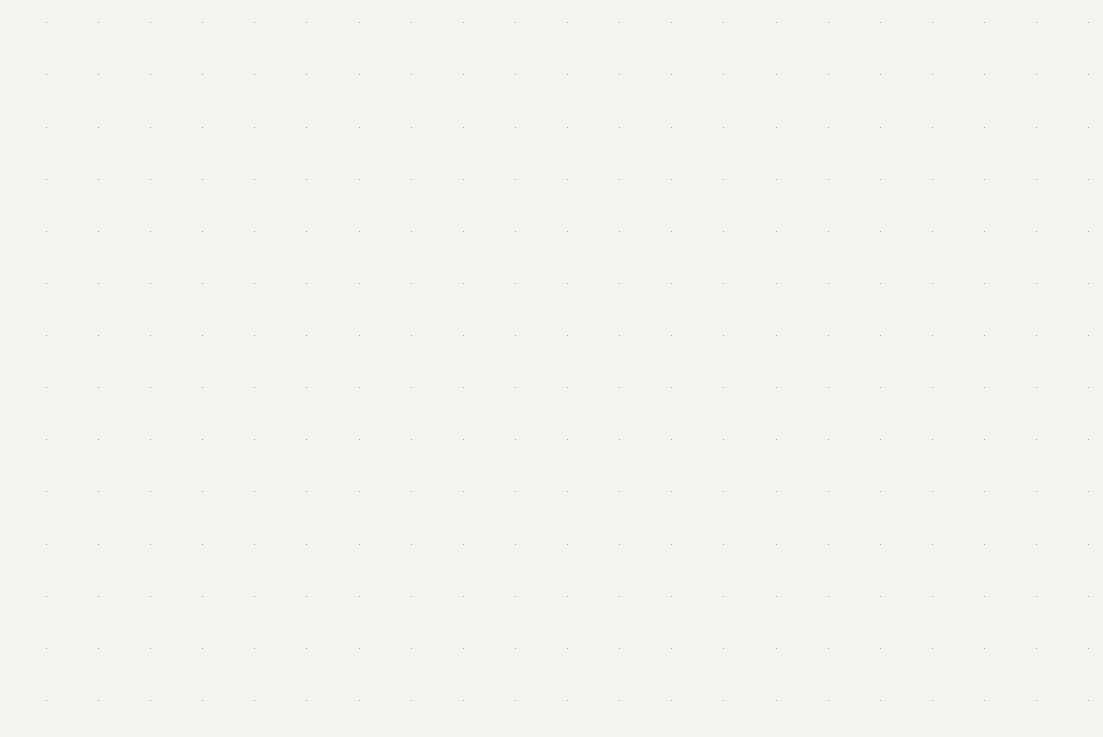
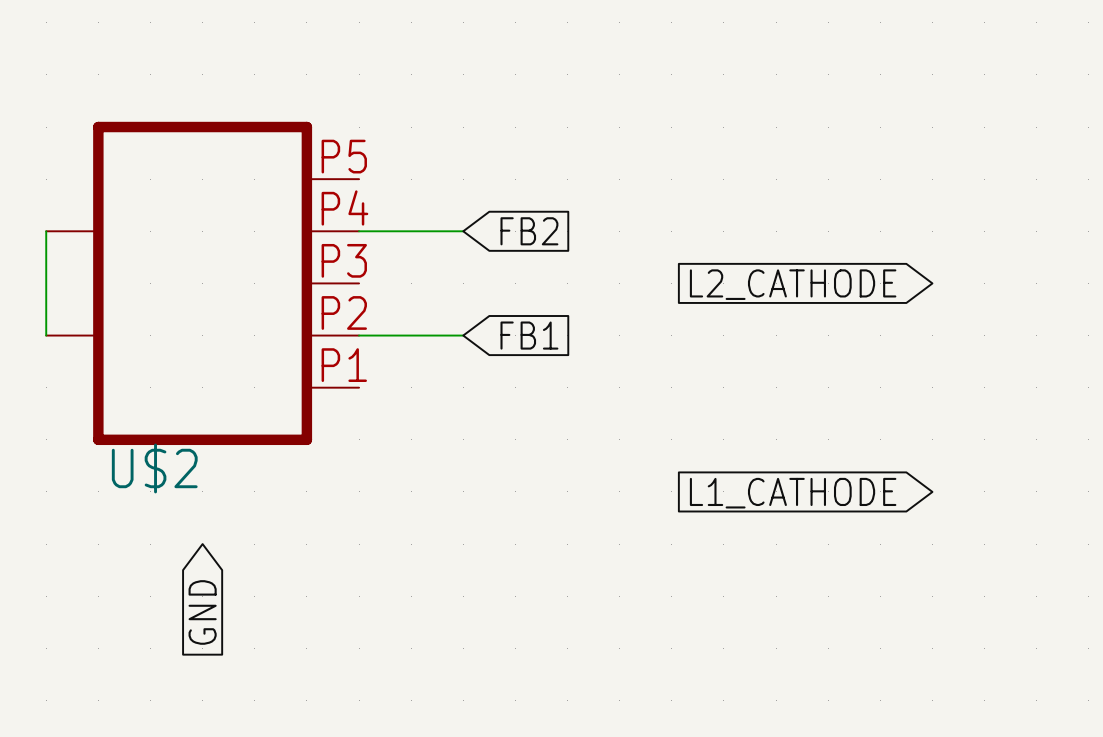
wire: none -> (46, 231) (46, 335)
wire: none -> (359, 231) (463, 231)
global label: none -> FB2 (529, 231)
U$2: none -> (202, 283)
global label: none -> L2_CATHODE (793, 284)
wire: none -> (359, 335) (463, 335)
global label: none -> FB1 (529, 335)
global label: none -> L1_CATHODE (793, 493)
global label: none -> GND (202, 612)

